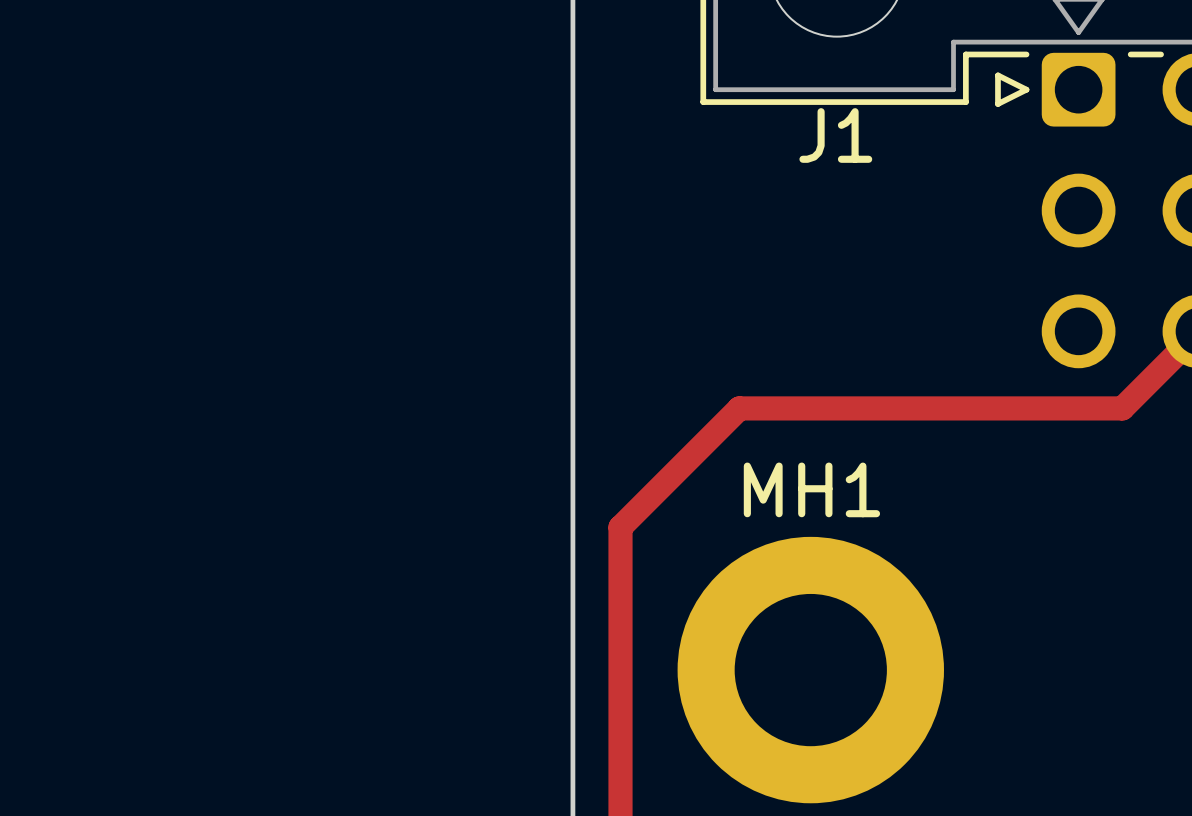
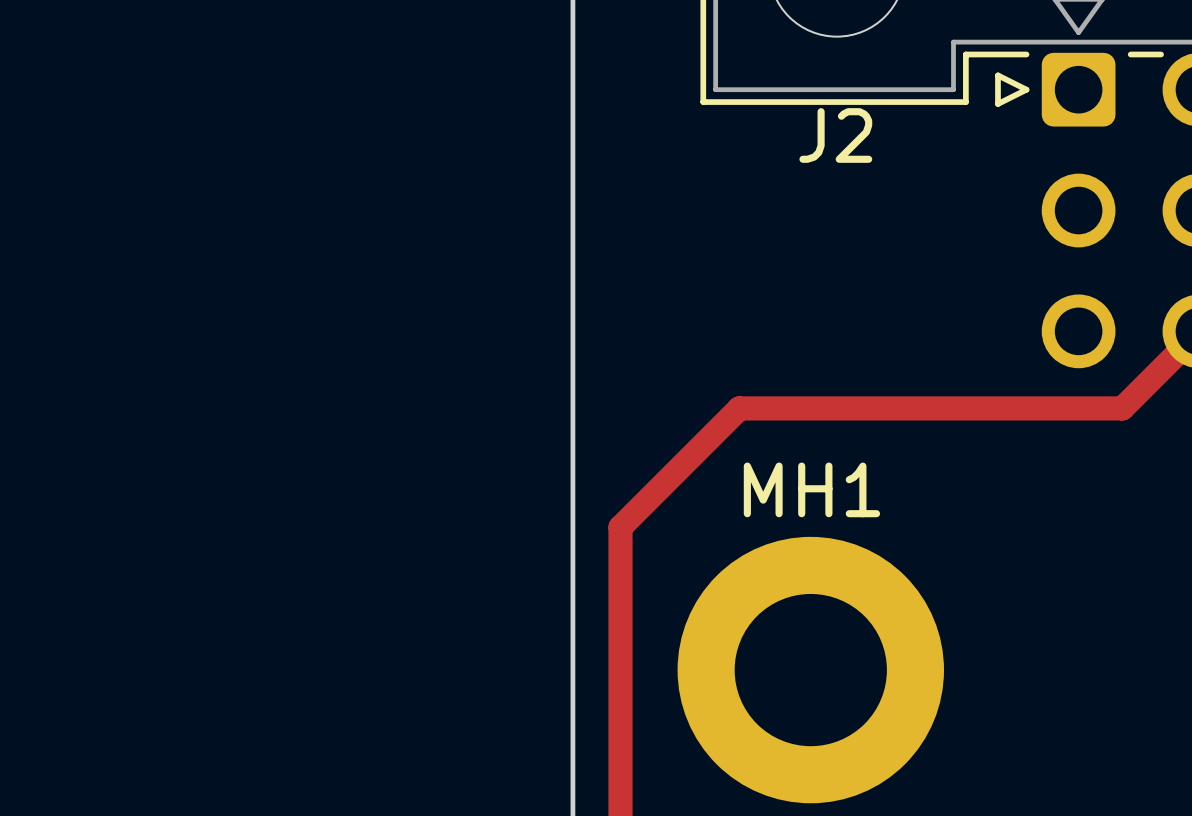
J1 name: J1 (835, 135) -> J2 (835, 135)

